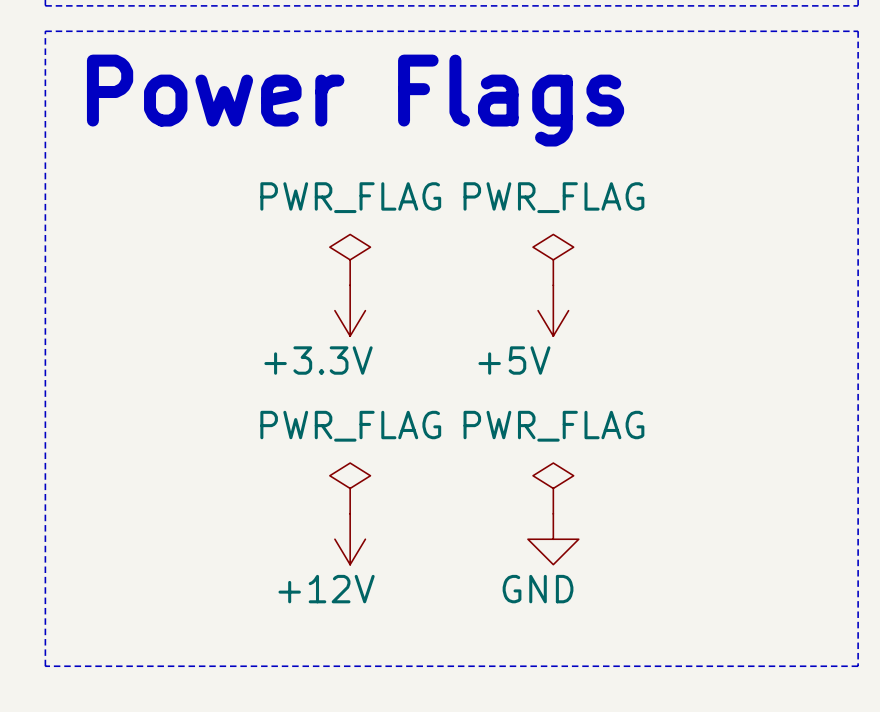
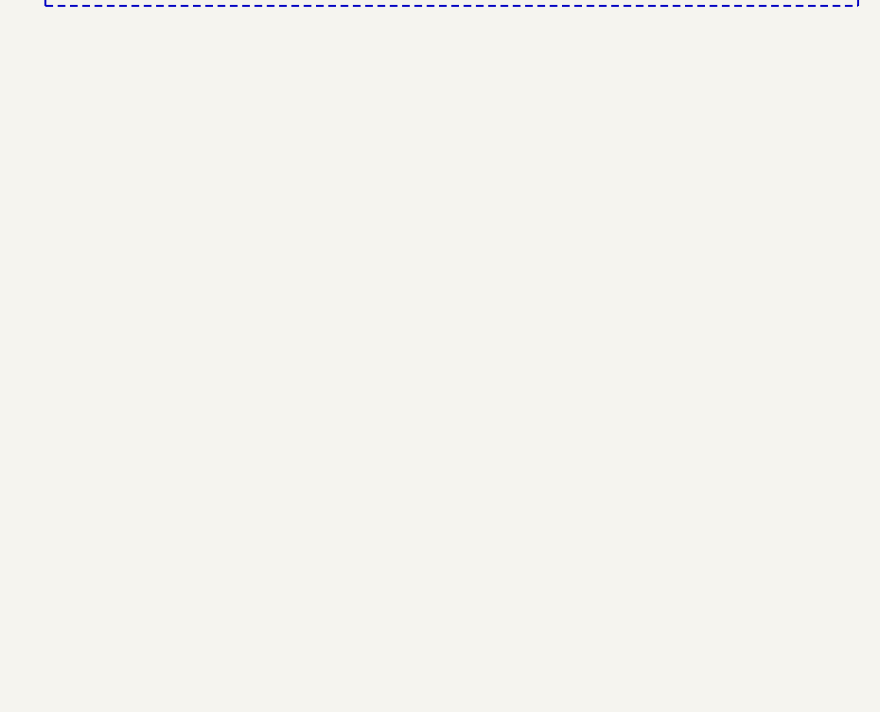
line: (45, 31) (45, 666) (858, 666) (858, 31) (45, 31) -> none
text: Power Flags (355, 100) -> none
power symbol: PWR_FLAG (350, 259) -> none
power symbol: PWR_FLAG (553, 259) -> none
power symbol: +3.3V (350, 310) -> none
power symbol: +5V (553, 310) -> none
power symbol: PWR_FLAG (350, 488) -> none
power symbol: PWR_FLAG (553, 488) -> none
power symbol: +12V (350, 539) -> none
power symbol: GND (553, 539) -> none

